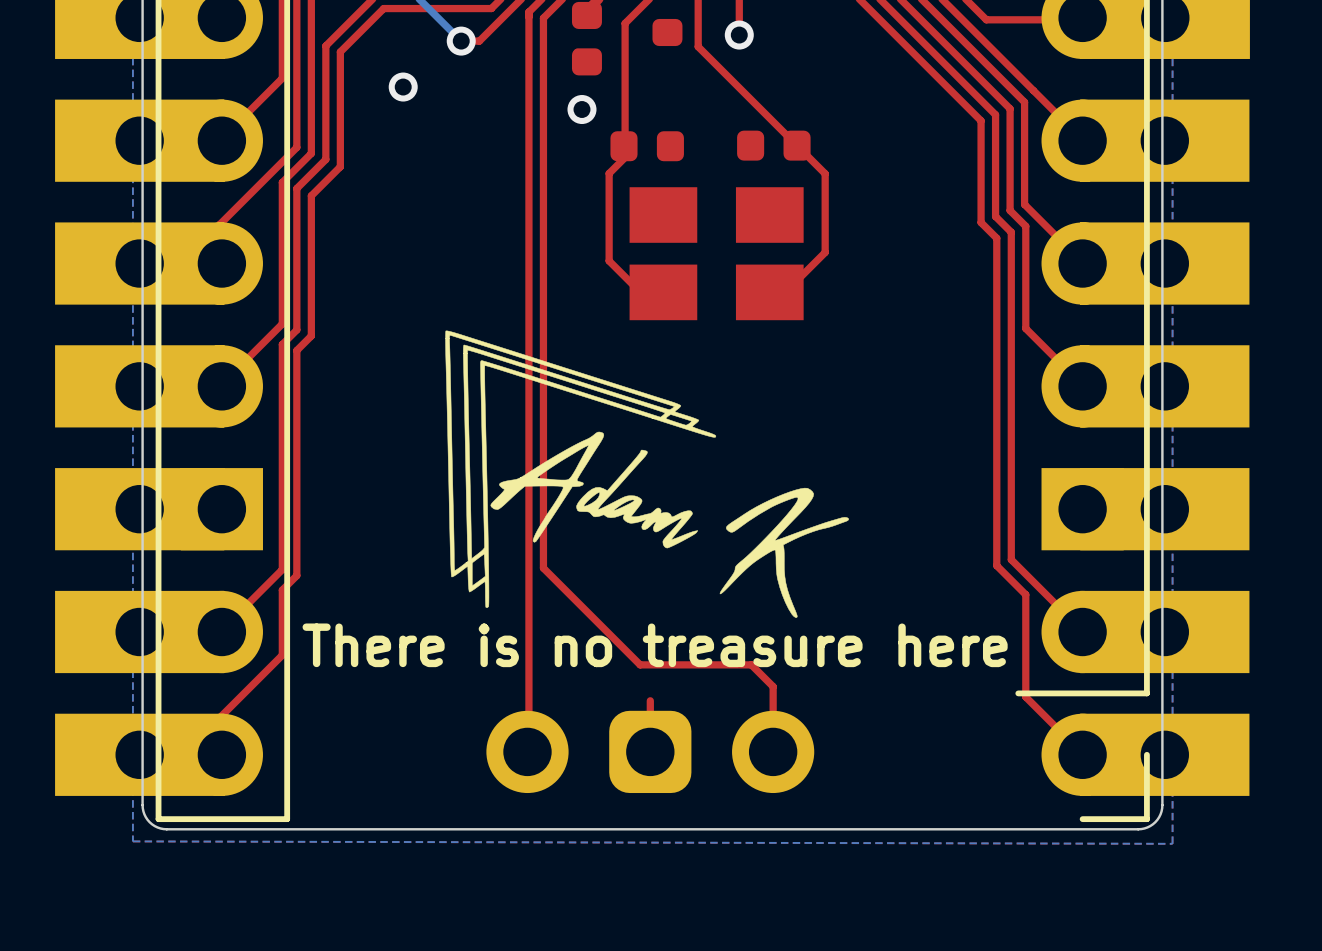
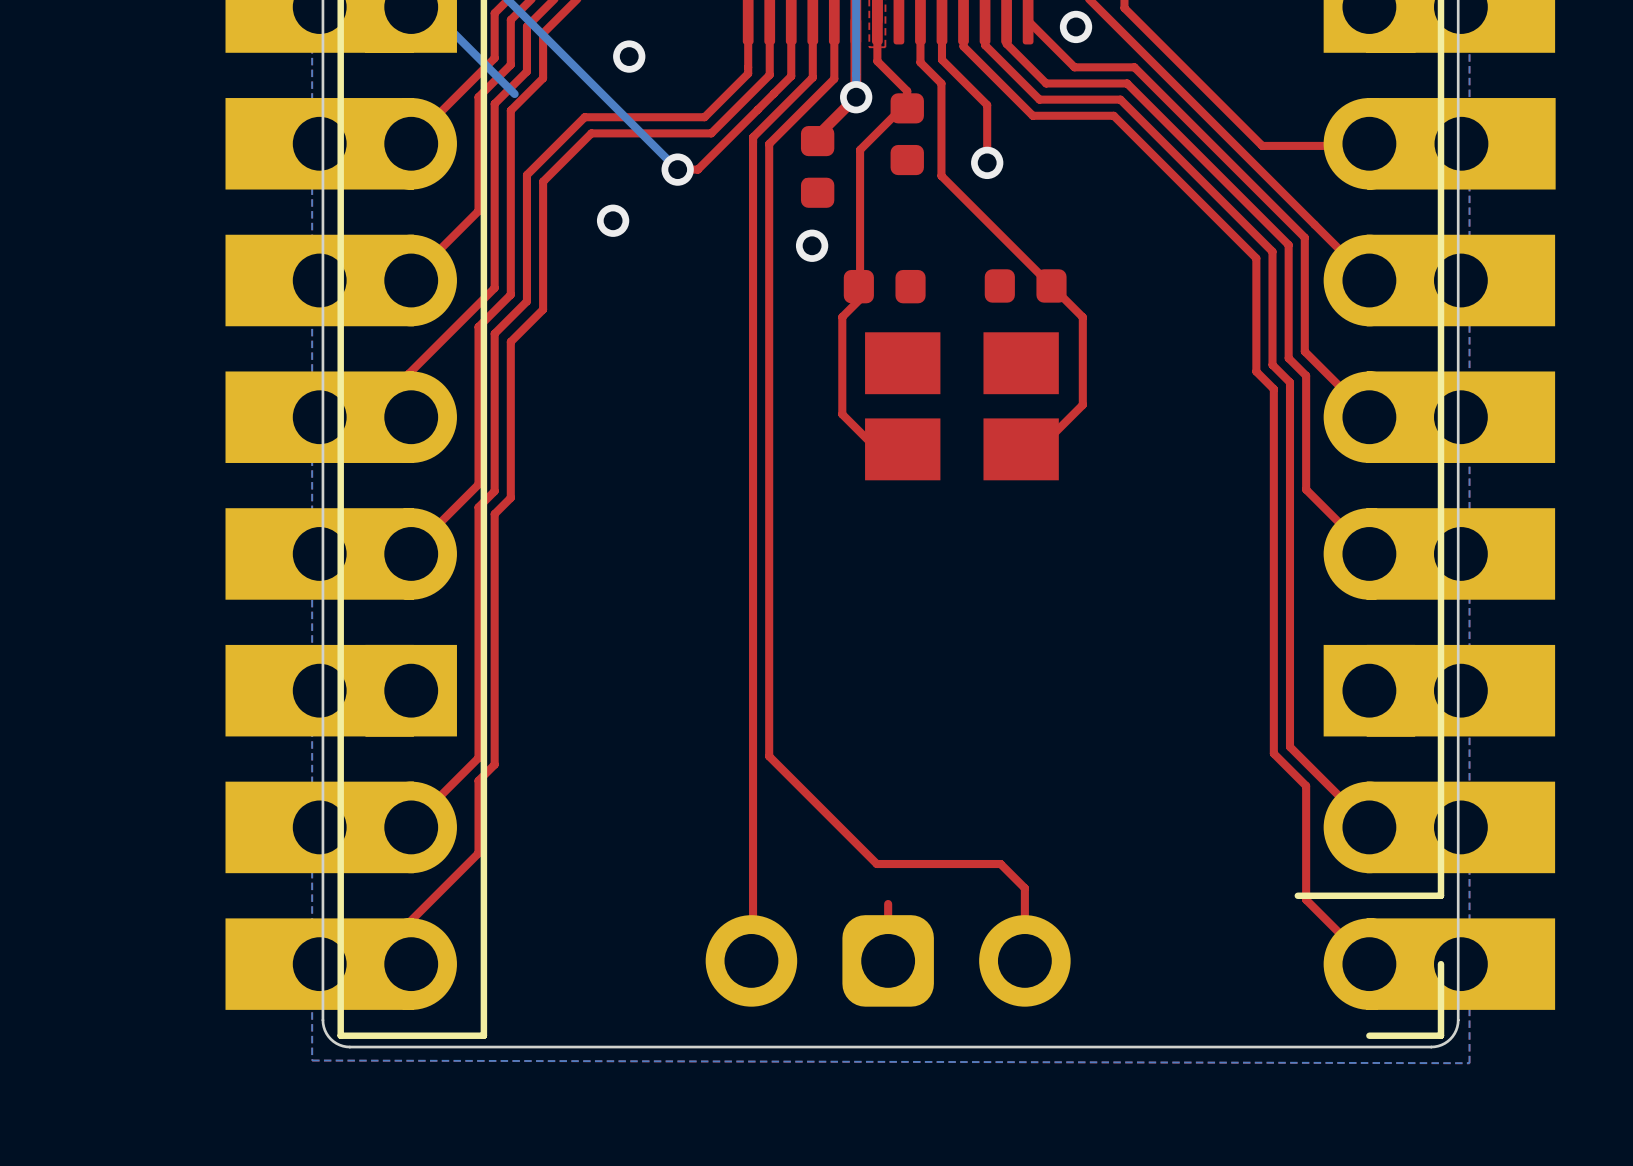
drawing: [445, 330, 849, 618] -> none
text: There is no treasure here (655, 645) -> none

